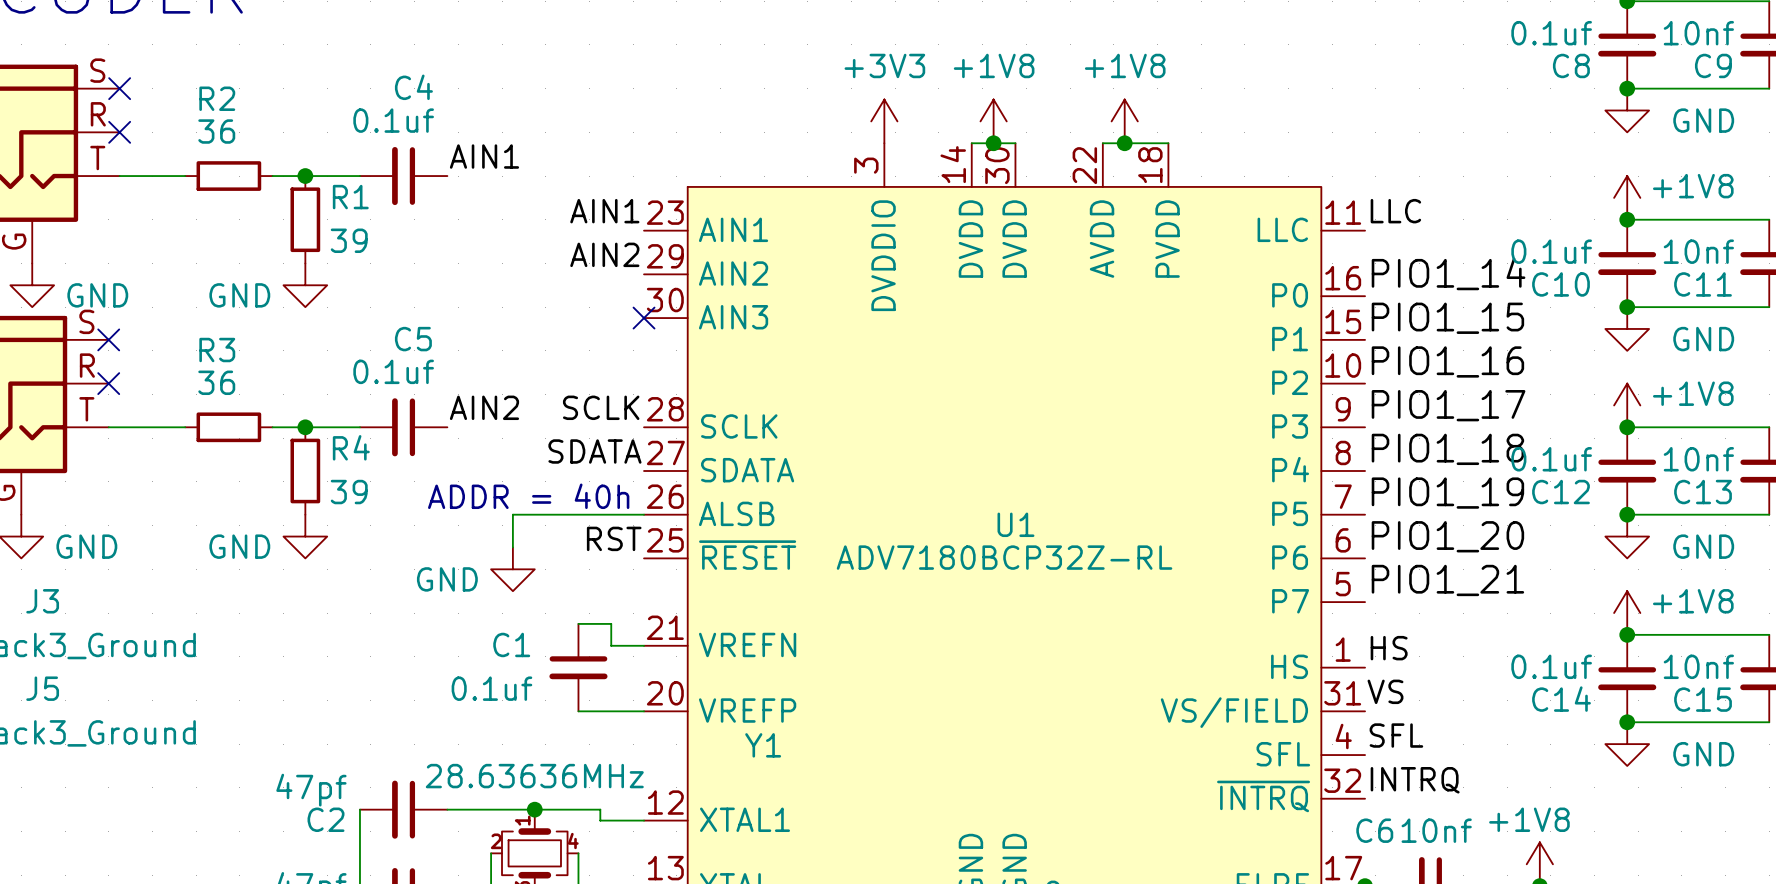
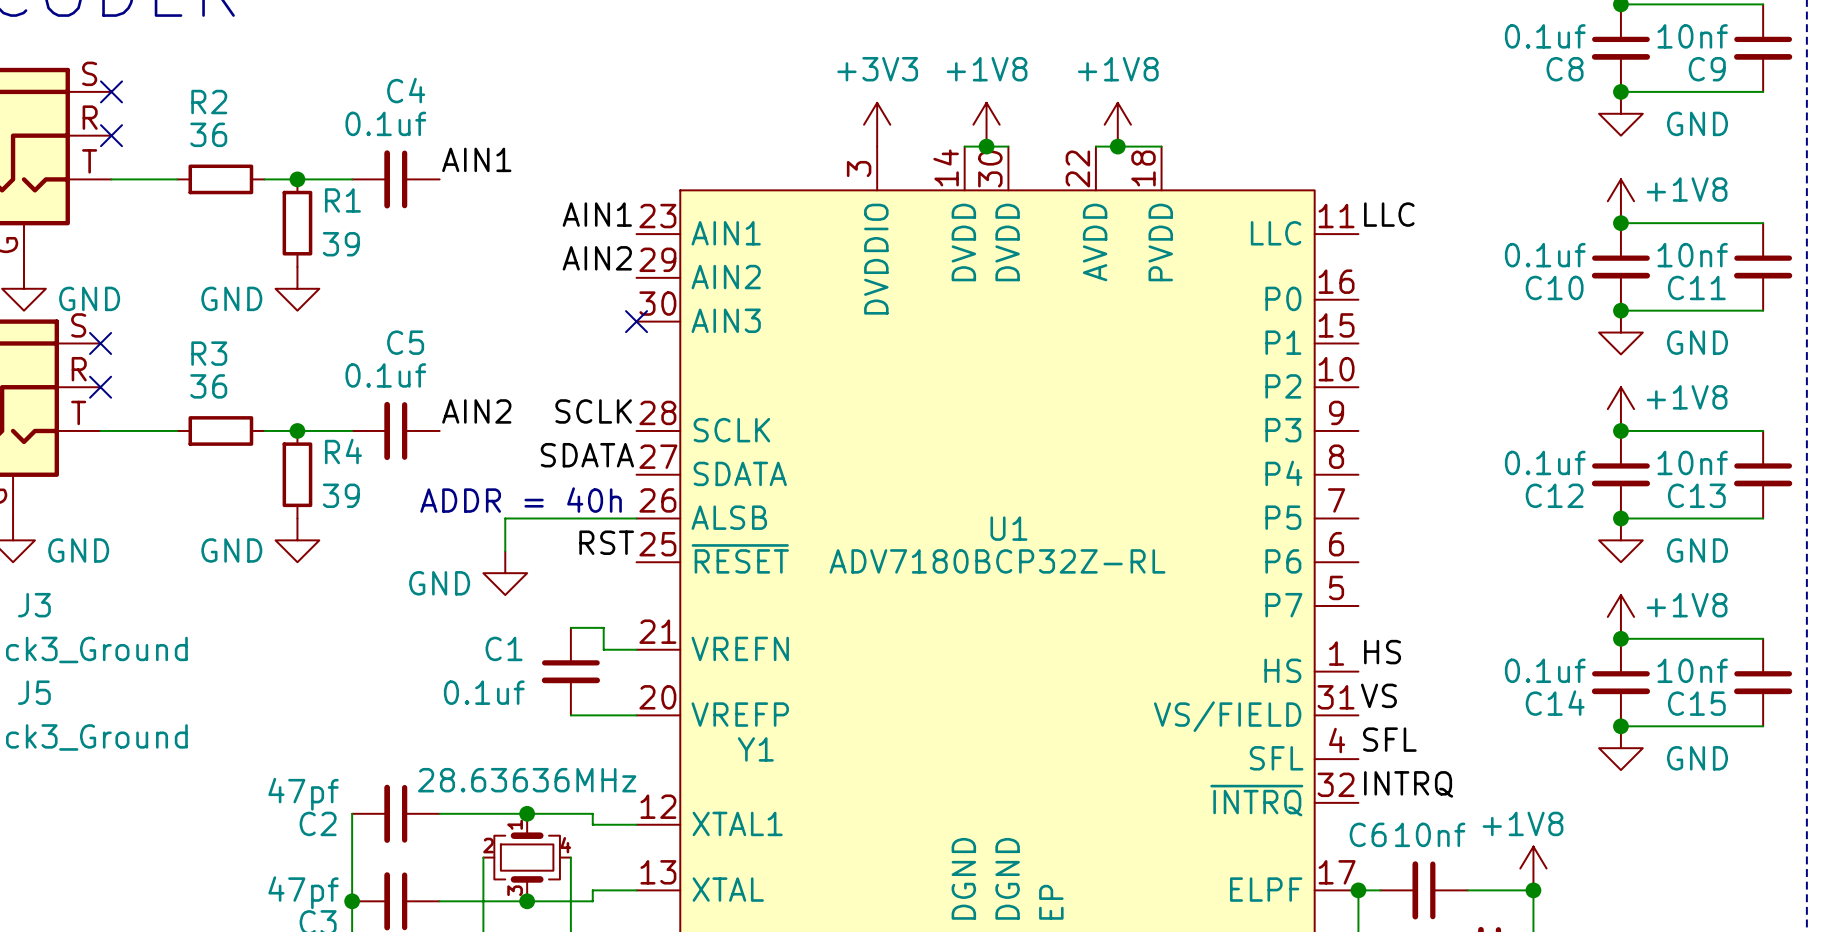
label: PIO1_14 (1448, 273) -> none
label: PIO1_15 (1447, 318) -> none
label: PIO1_16 (1447, 361) -> none
label: PIO1_17 (1448, 405) -> none
label: PIO1_18 (1447, 449) -> none
label: PIO1_19 (1447, 493) -> none
label: PIO1_20 (1447, 536) -> none
label: PIO1_21 (1447, 580) -> none

